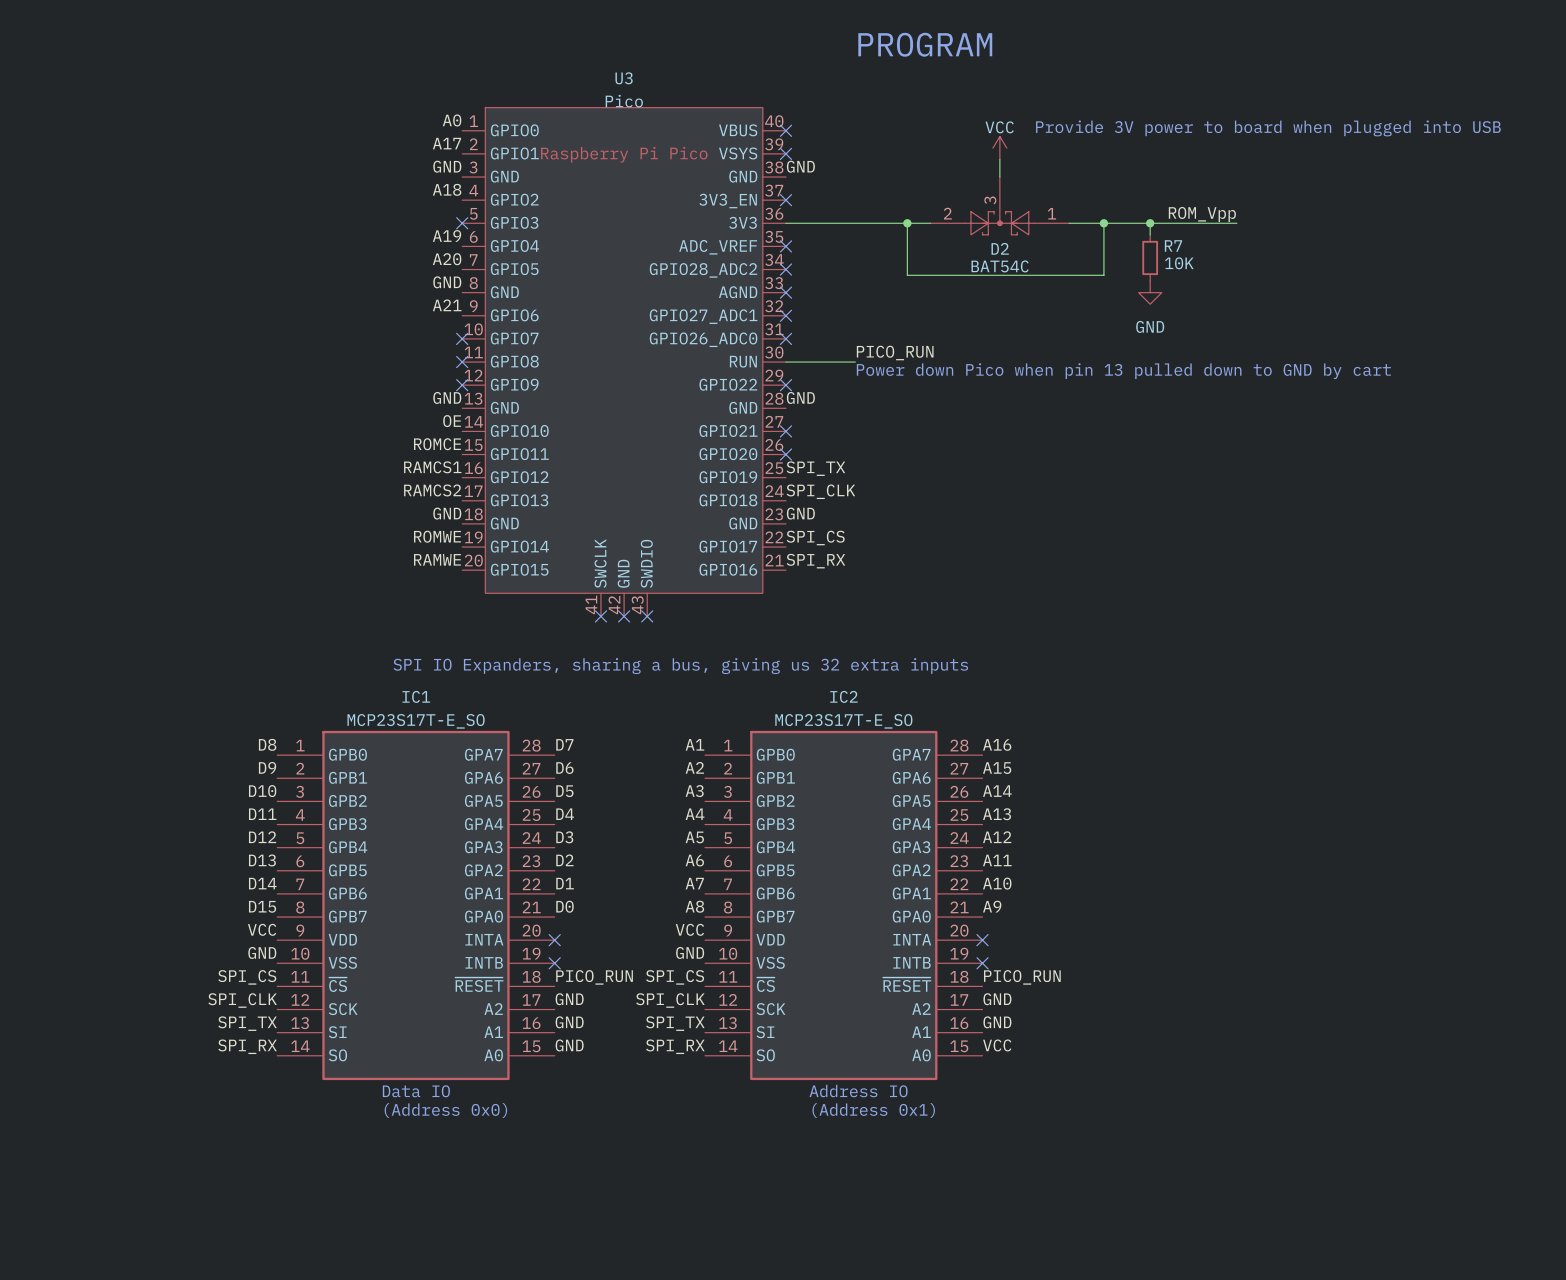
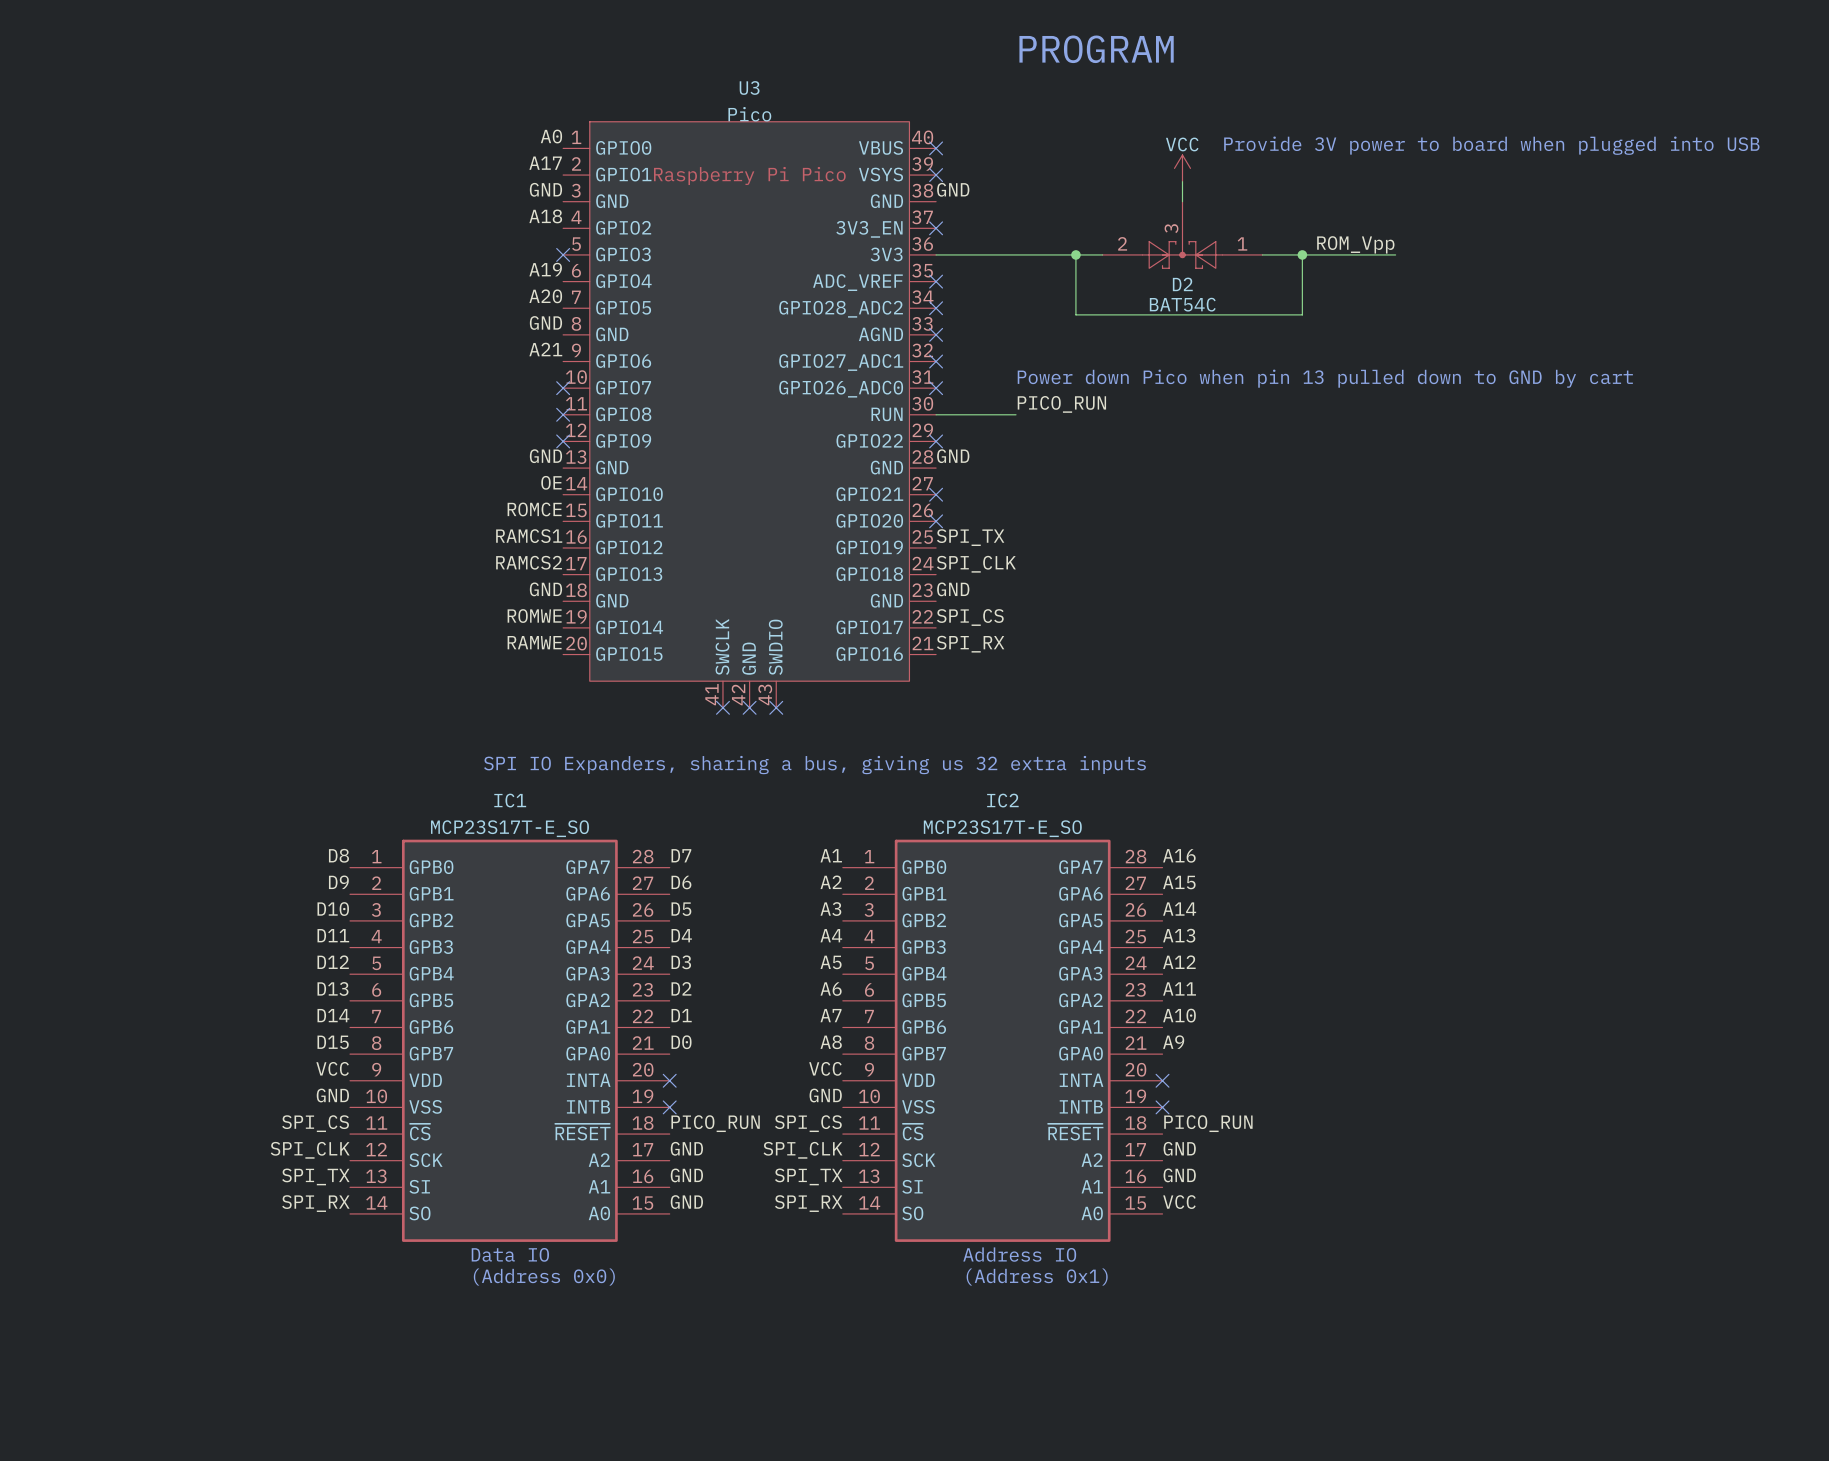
label position: ROM_Vpp (1202, 214) -> ROM_Vpp (1355, 244)
wire: (1150, 223) (1150, 234) -> none
junction: (1150, 223) -> none
wire: (1184, 223) (1236, 223) -> none
R7: 10K (1150, 257) -> none
power symbol: GND (1150, 292) -> none
text position: Power down Pico when pin 13 pulled down to GND by cart (1123, 371) -> Power down Pico when pin 13 pulled down to GND by cart (1325, 378)

